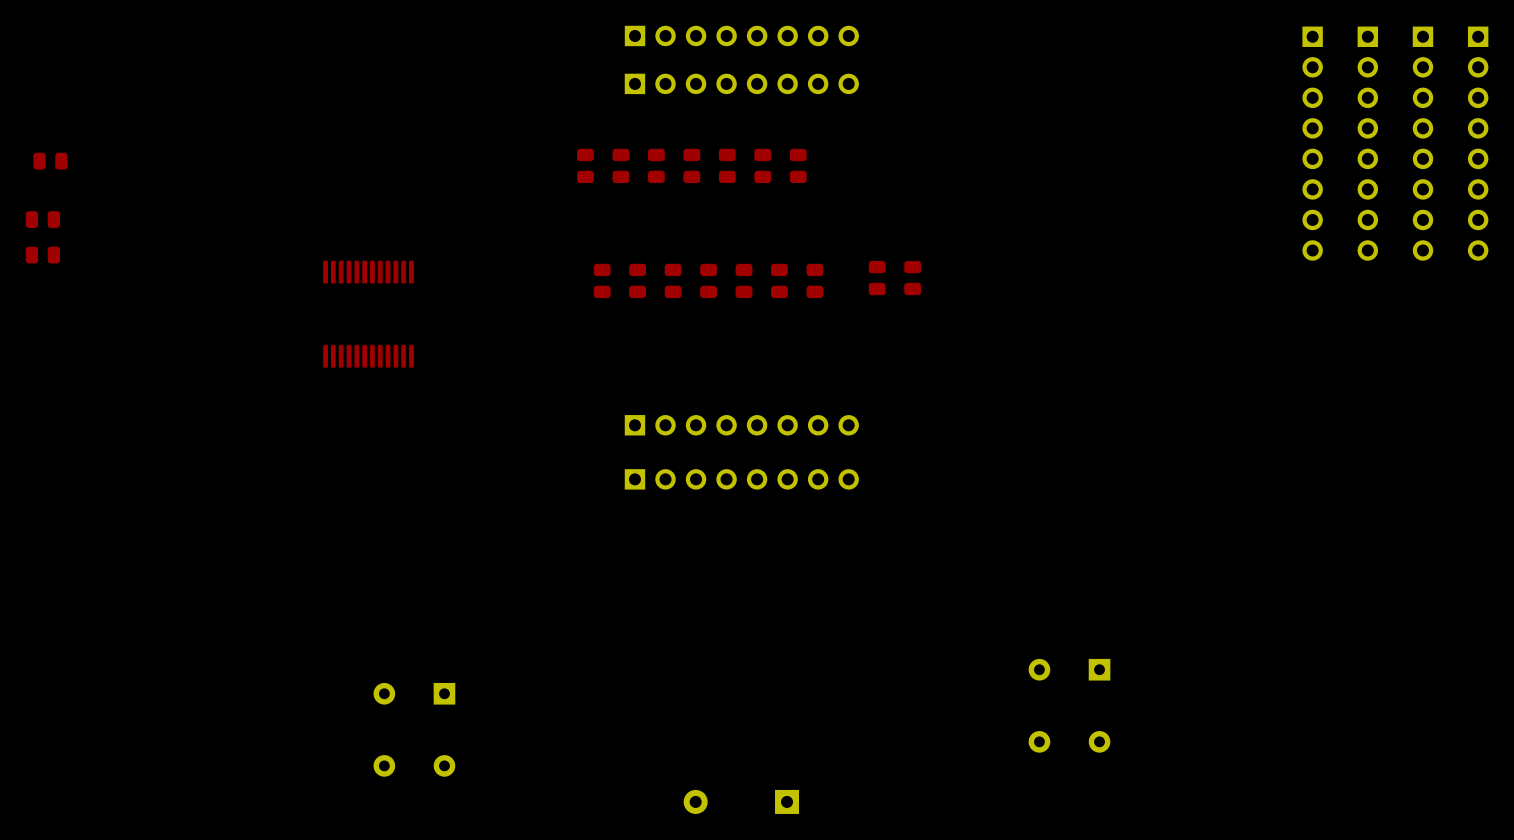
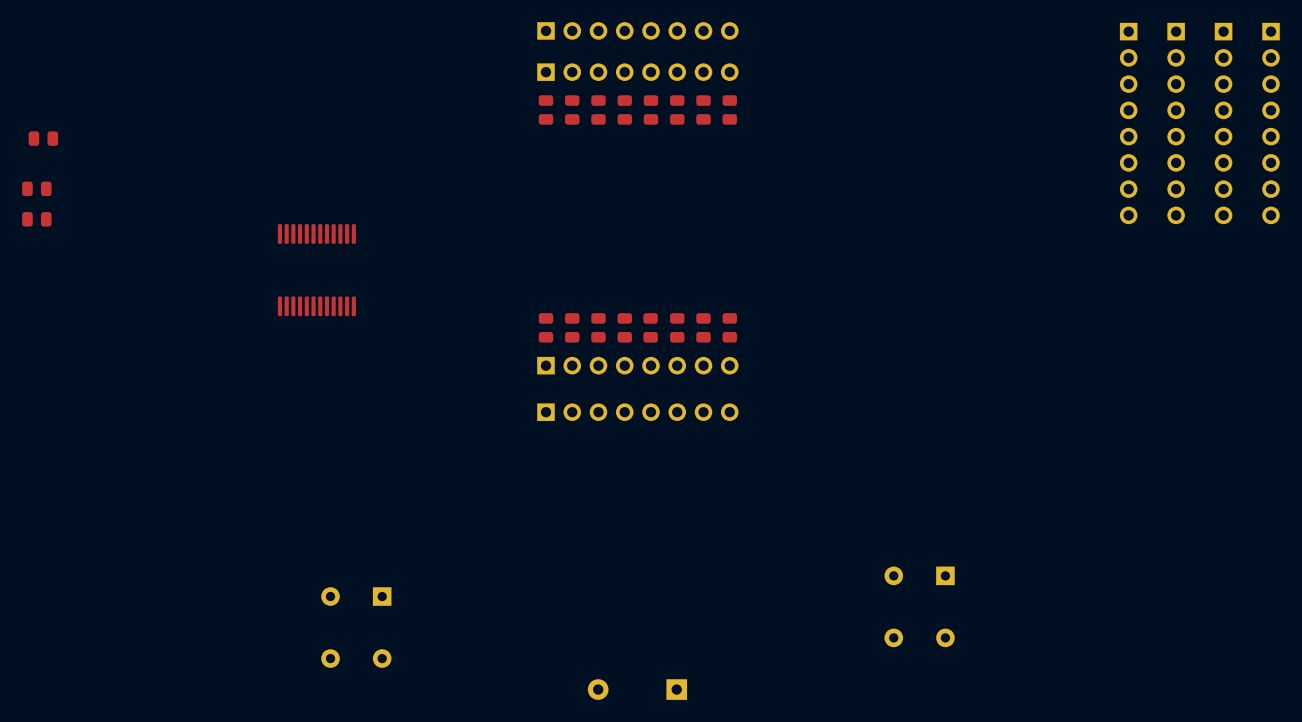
part: none -> (545, 109)
part: none -> (572, 109)
part: none -> (598, 109)
part: none -> (624, 109)
part: none -> (650, 109)
part: none -> (677, 109)
part: none -> (703, 109)
part: none -> (729, 109)
part: (585, 165) -> none
part: (620, 165) -> none
part: (656, 165) -> none
part: (691, 165) -> none
part: (727, 165) -> none
part: (762, 165) -> none
part: (798, 165) -> none
part: (877, 278) -> none
part: (912, 278) -> none
part: (602, 280) -> none
part: (637, 280) -> none
part: (673, 280) -> none
part: (708, 280) -> none
part: (744, 280) -> none
part: (779, 280) -> none
part: (814, 280) -> none
part: none -> (545, 327)
part: none -> (572, 327)
part: none -> (598, 327)
part: none -> (624, 327)
part: none -> (650, 327)
part: none -> (677, 327)
part: none -> (703, 327)
part: none -> (729, 327)

